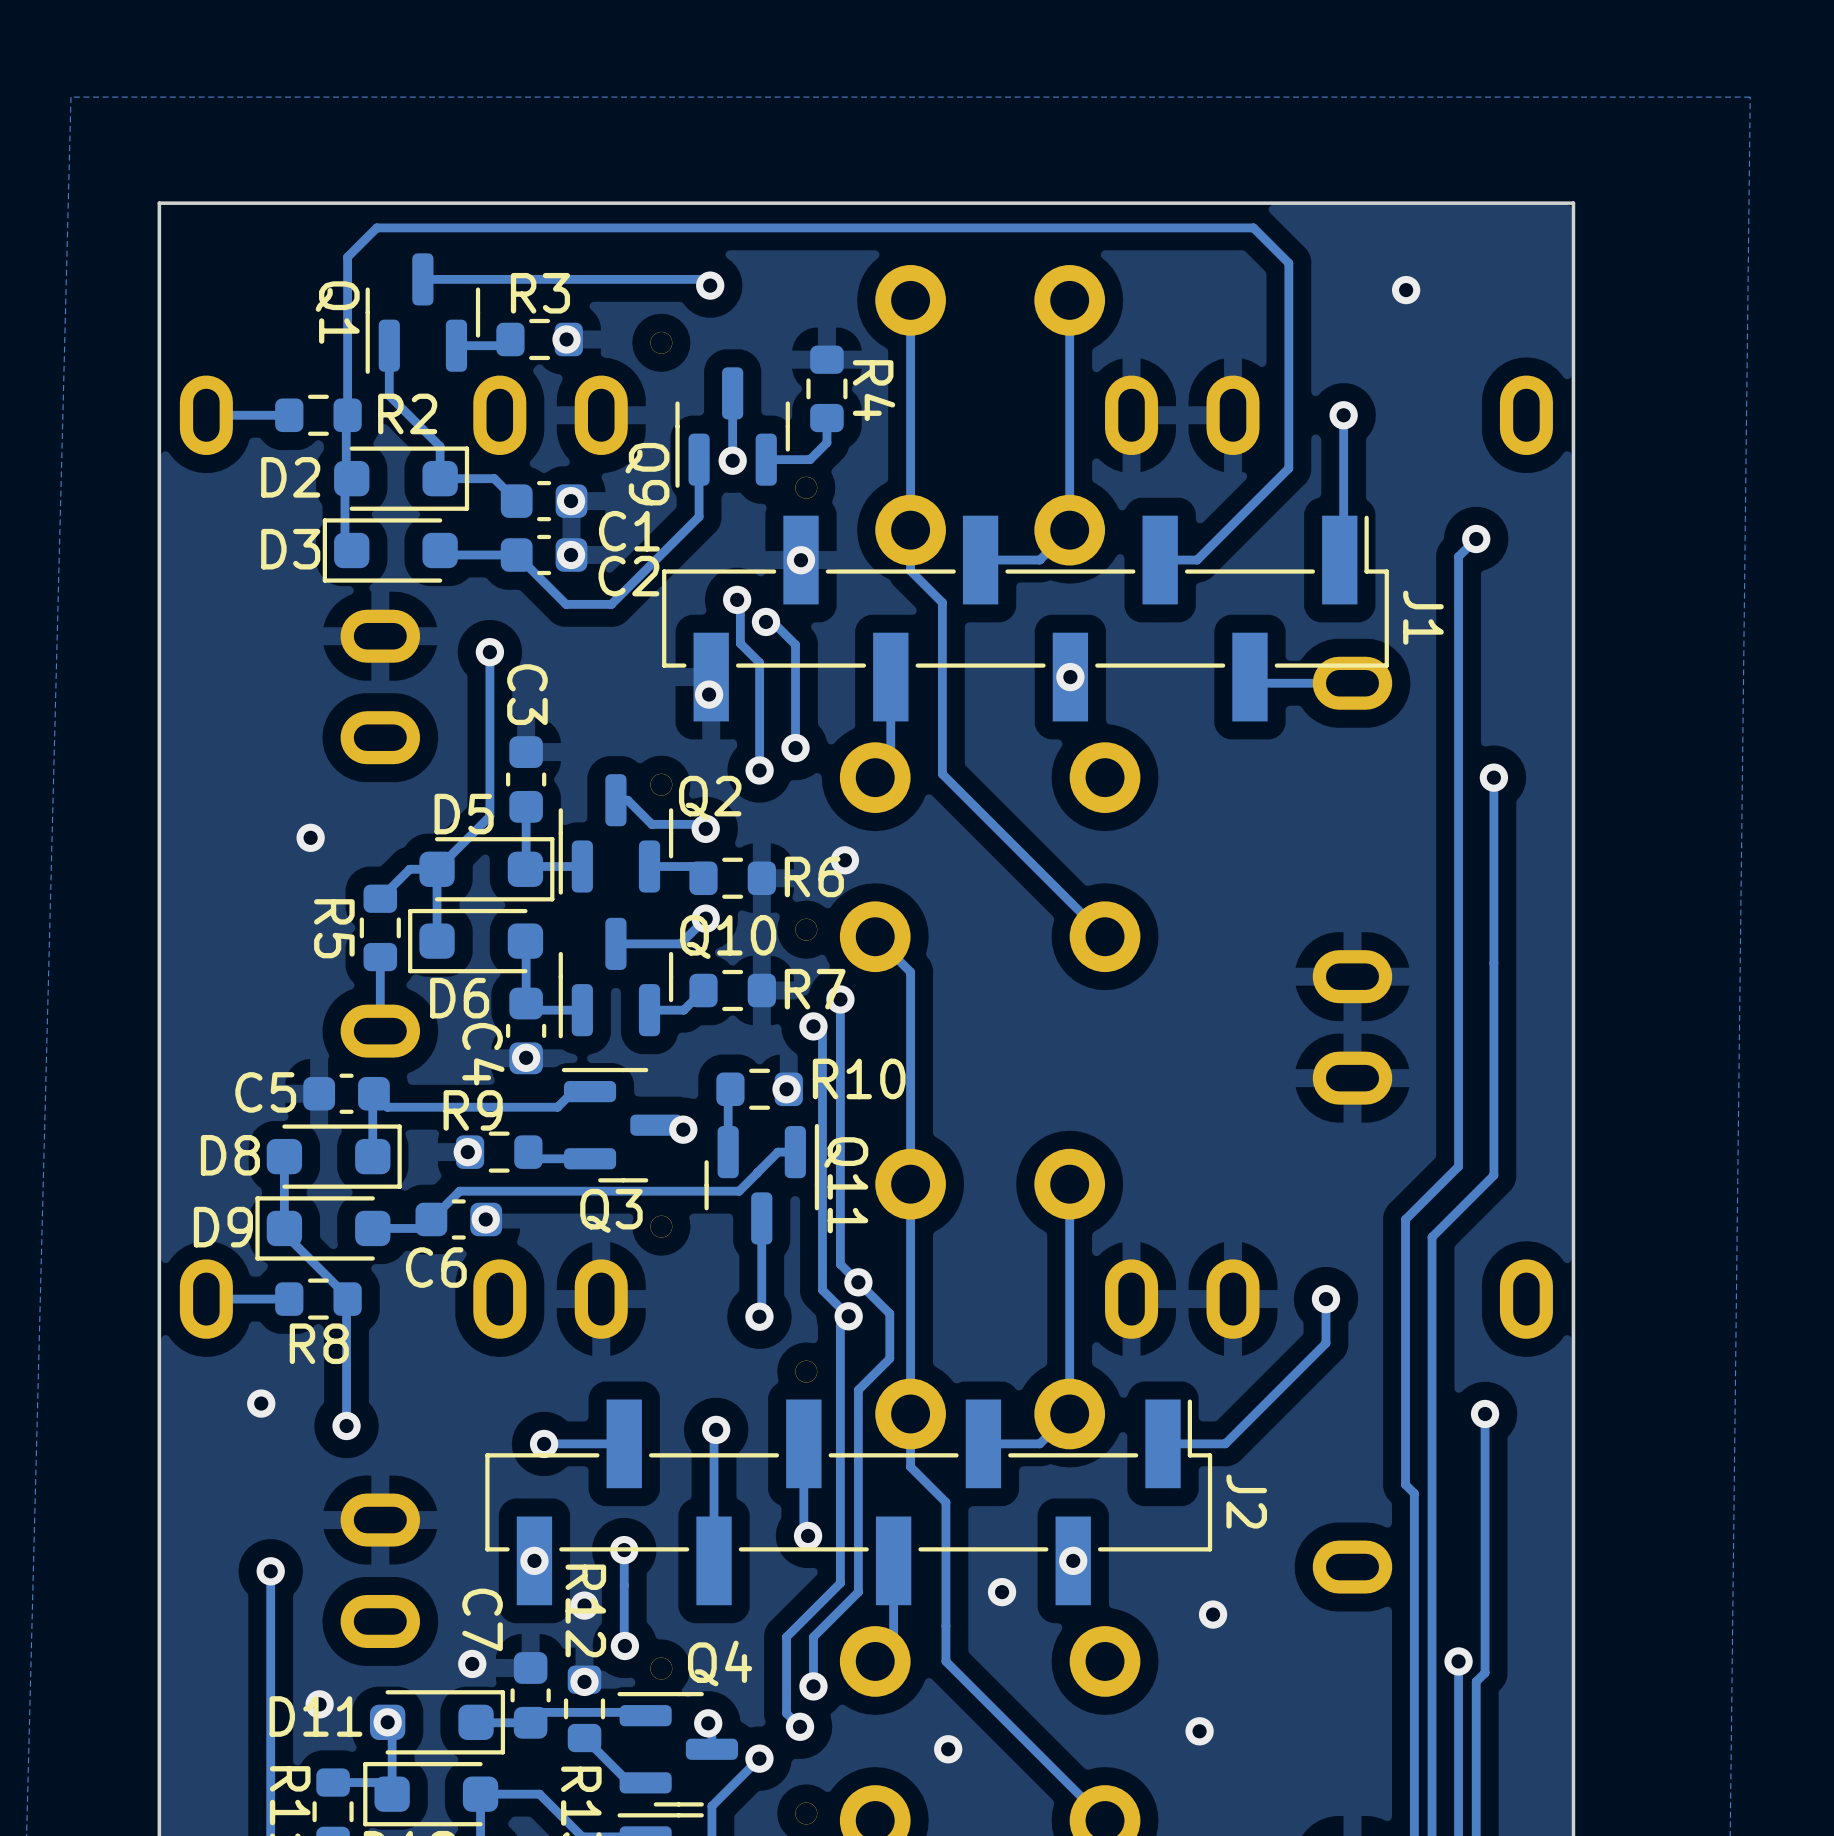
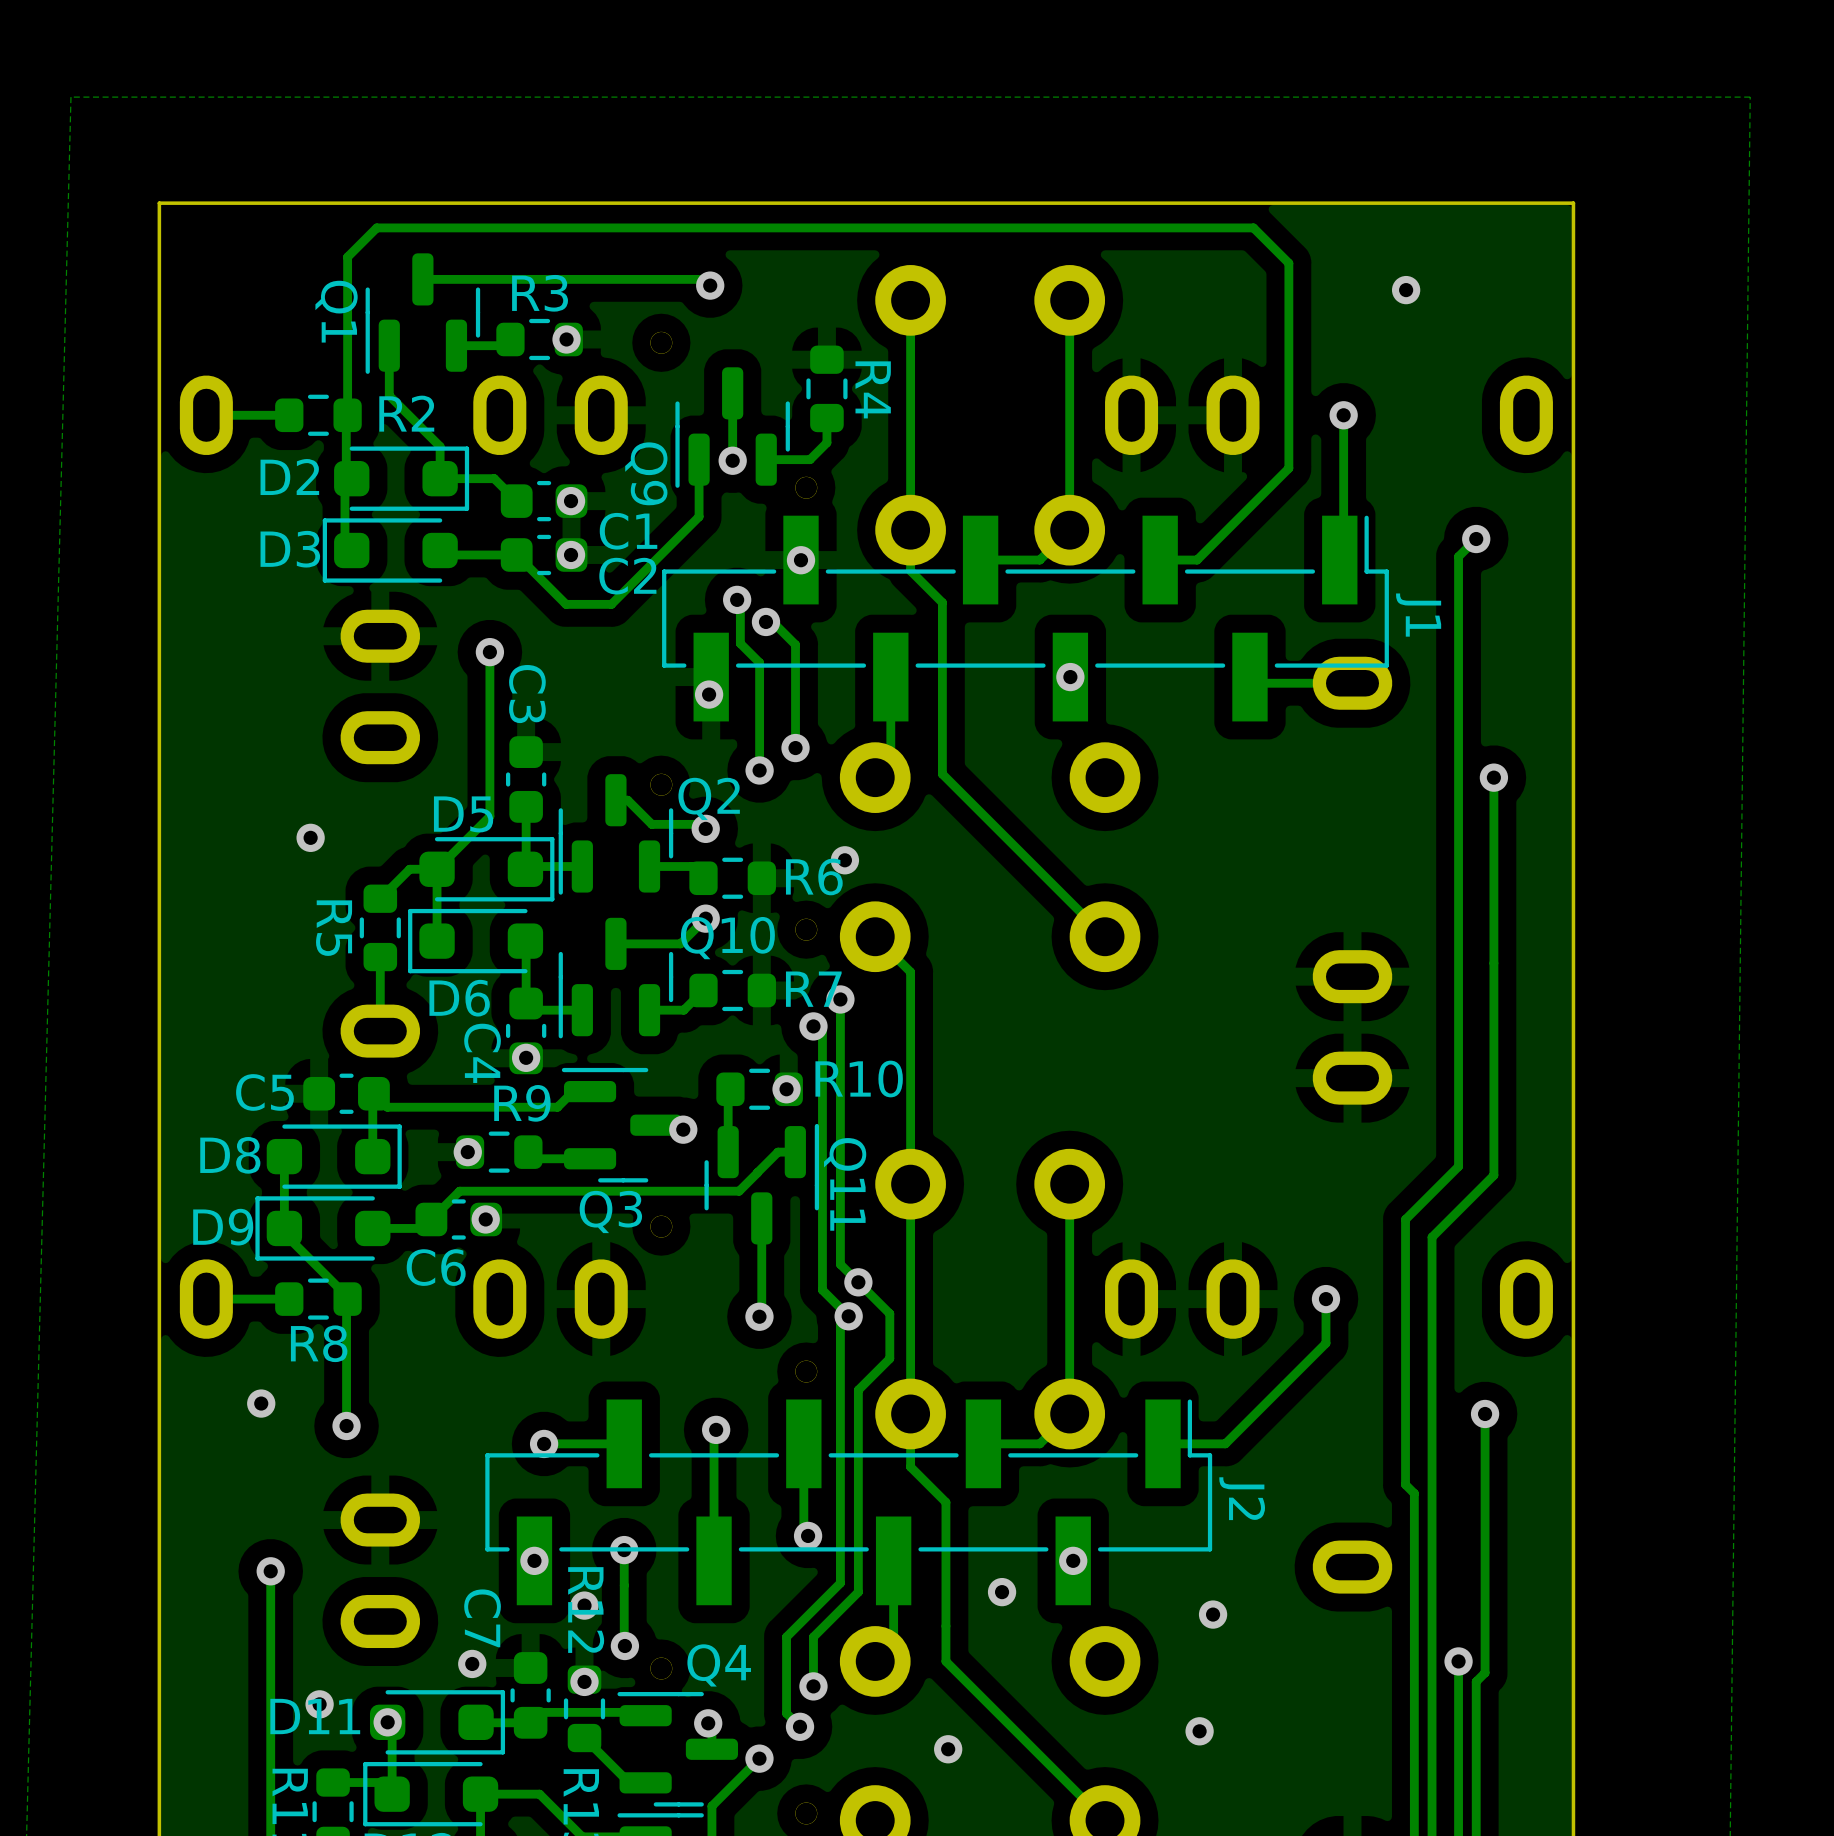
R9 name position: R9 (473, 1110) -> R9 (522, 1103)

